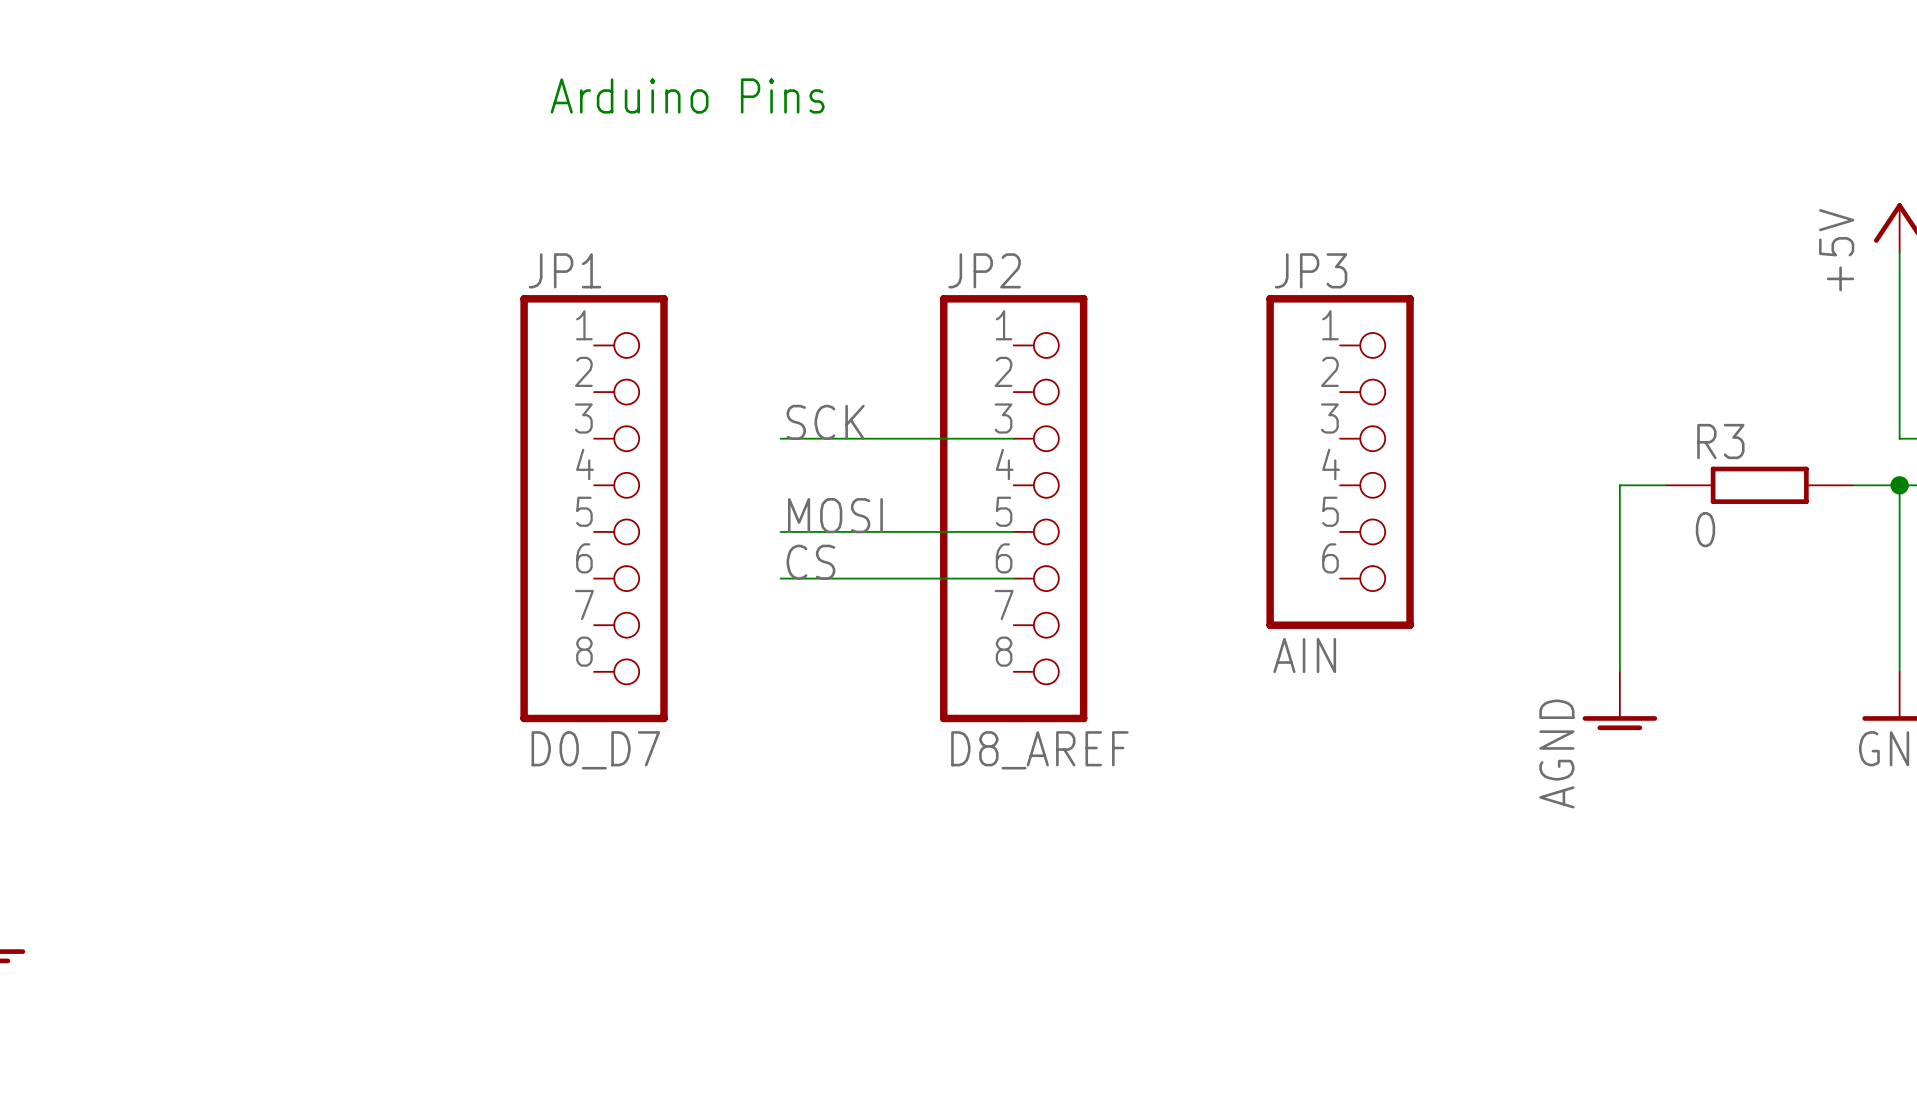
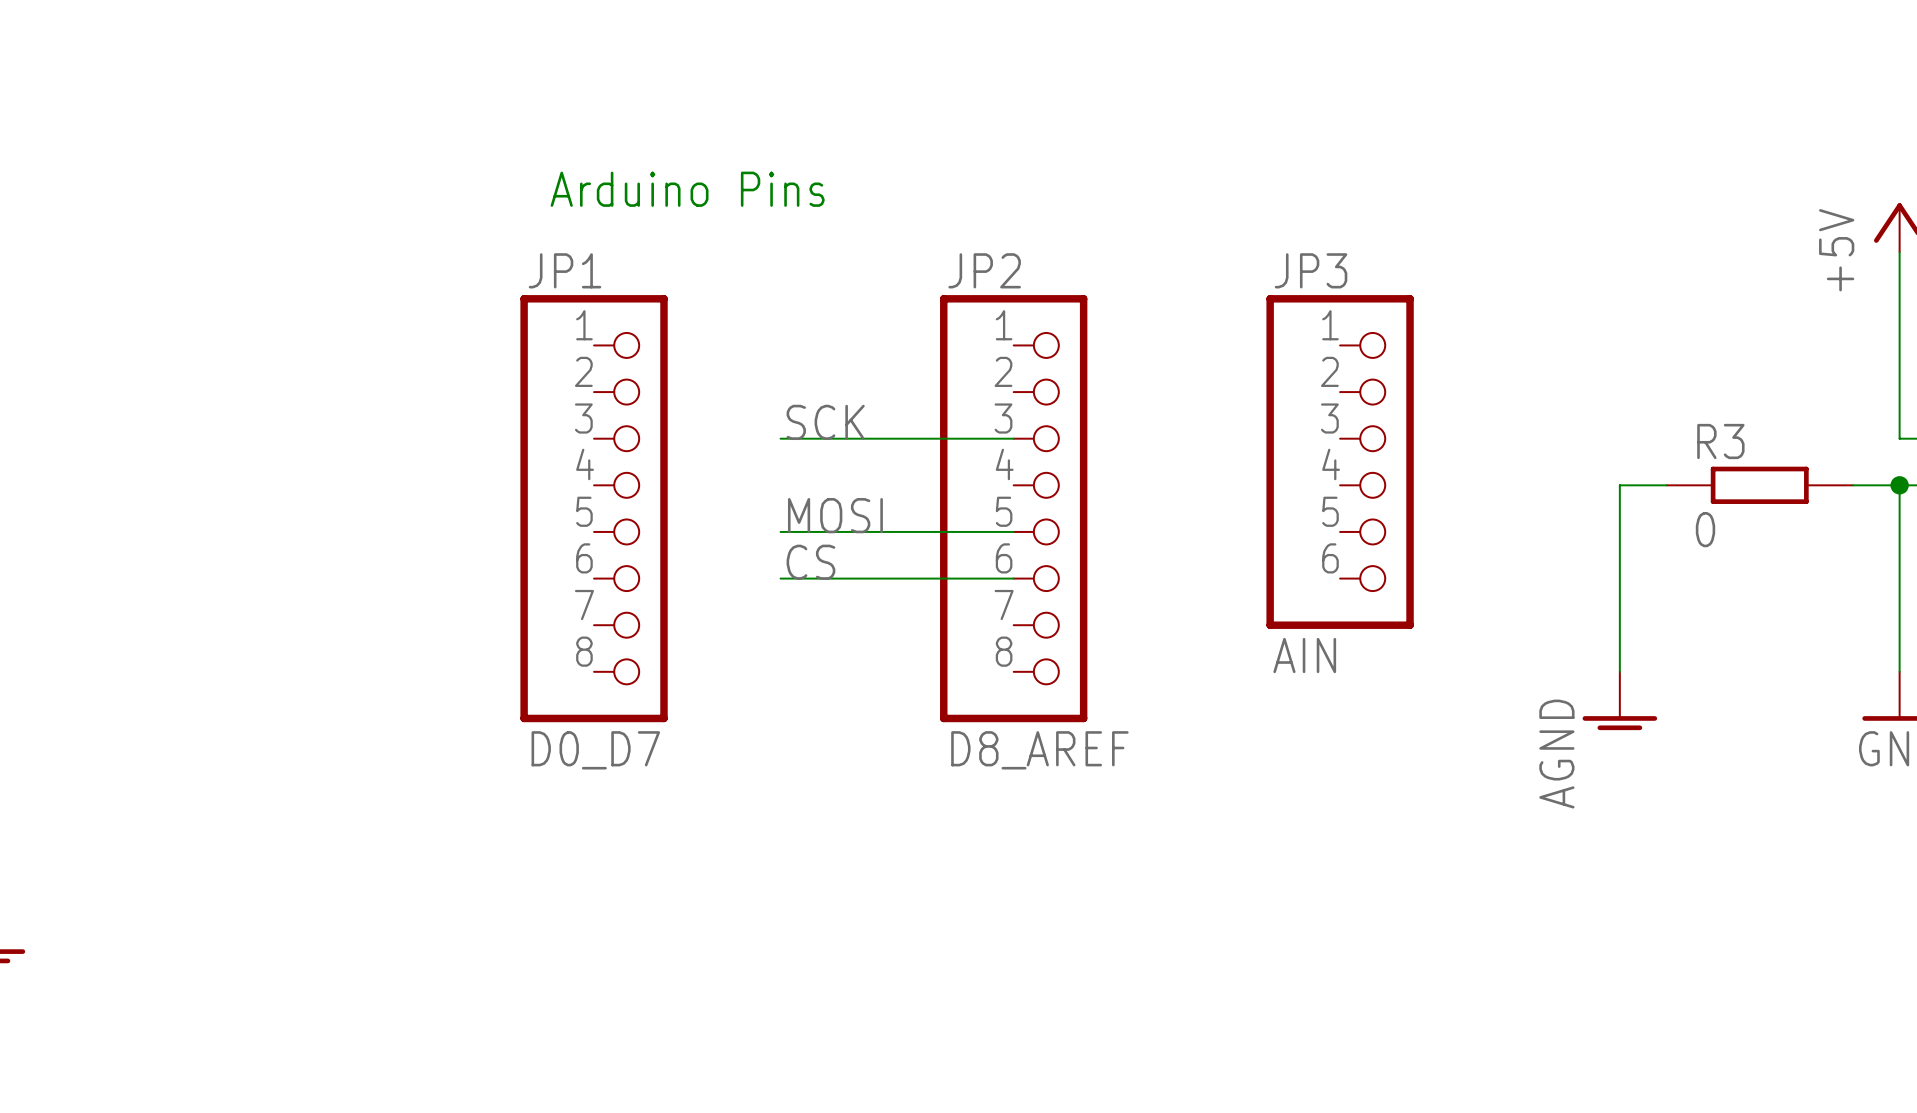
text position: Arduino Pins (687, 95) -> Arduino Pins (687, 189)

